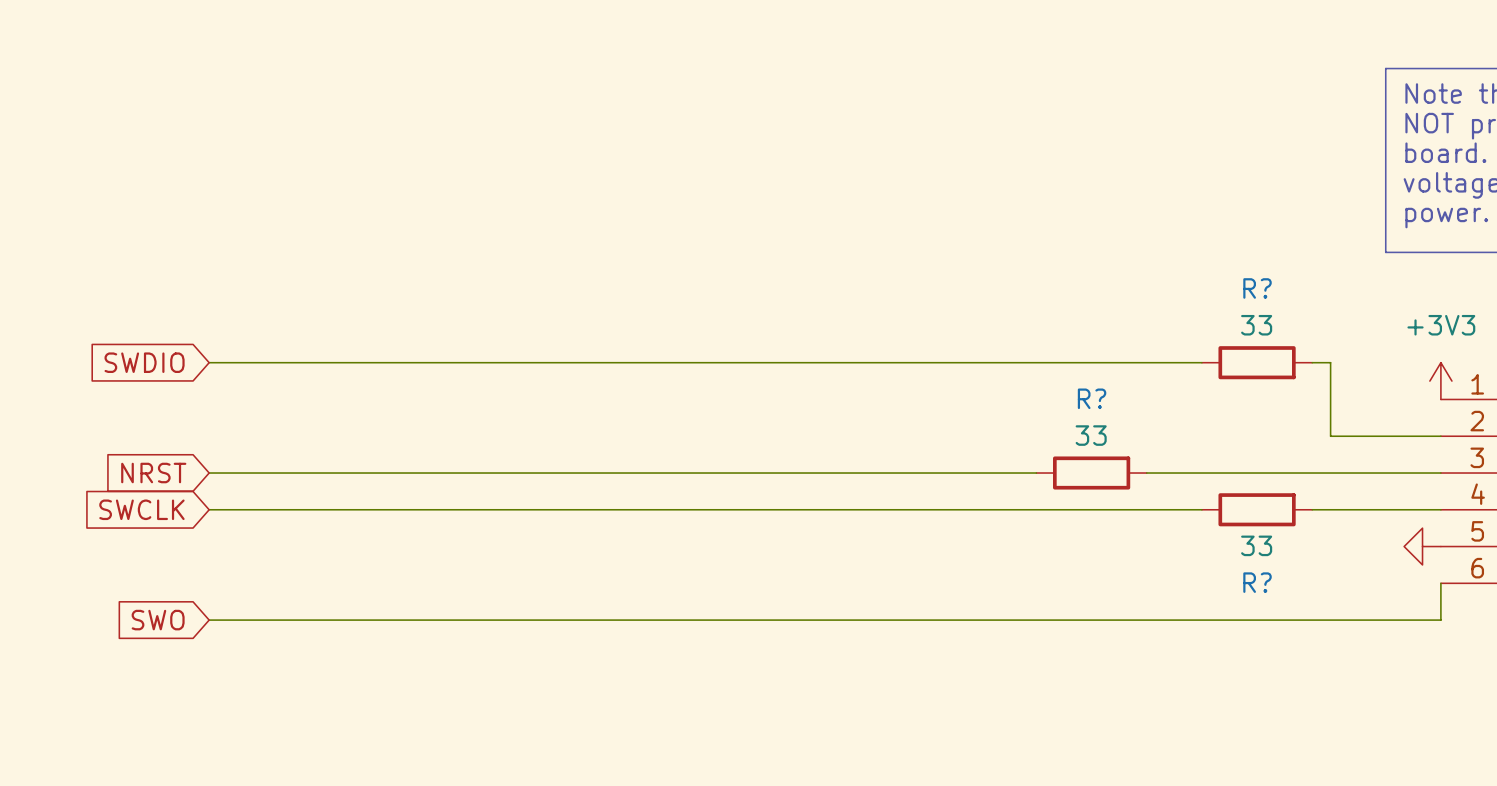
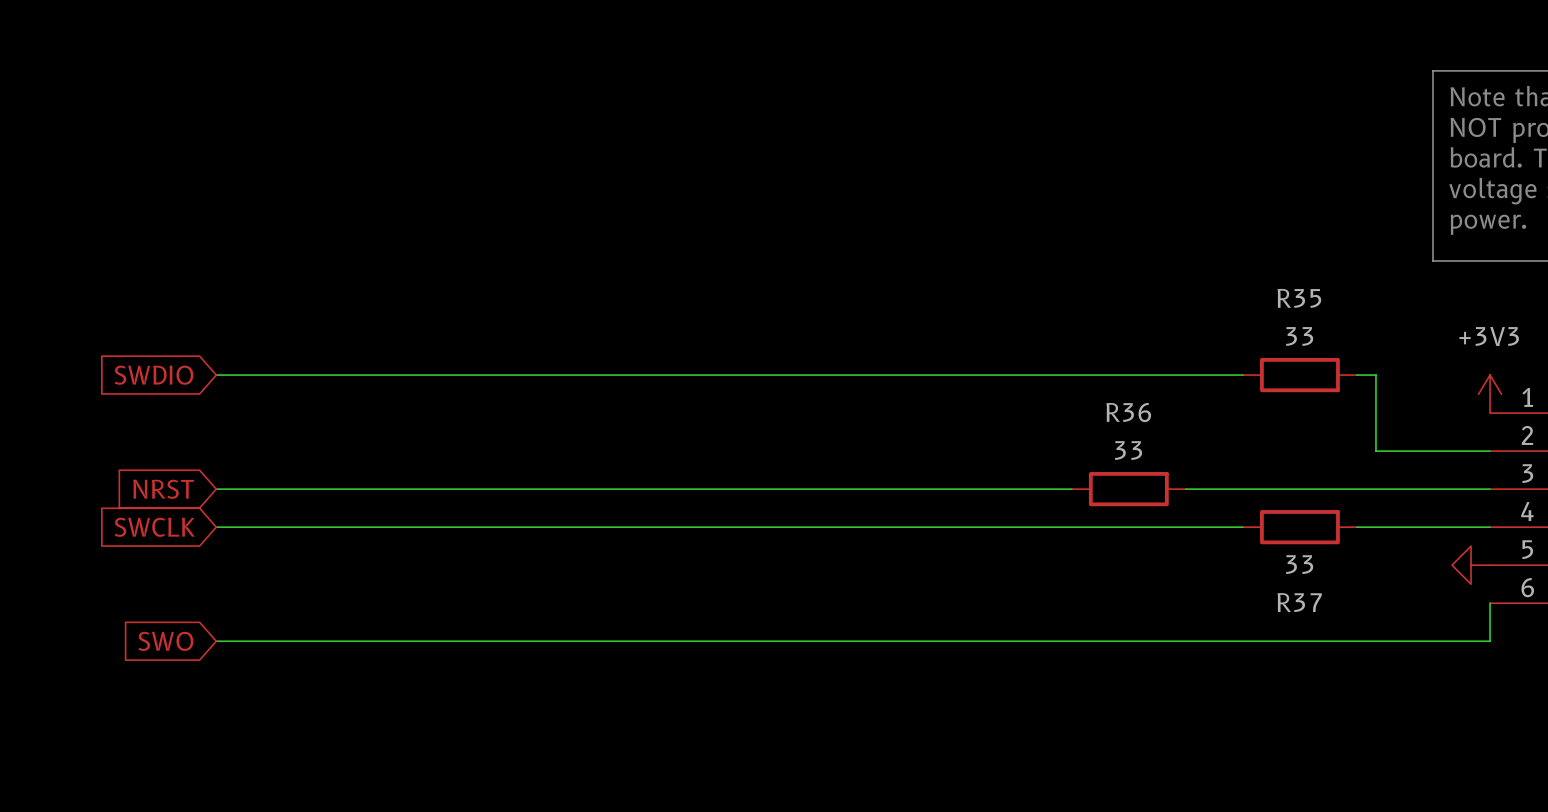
R? name: R? (1257, 288) -> R35 (1299, 298)
R? name: R? (1092, 398) -> R36 (1128, 412)
R? name: R? (1257, 582) -> R37 (1299, 602)

